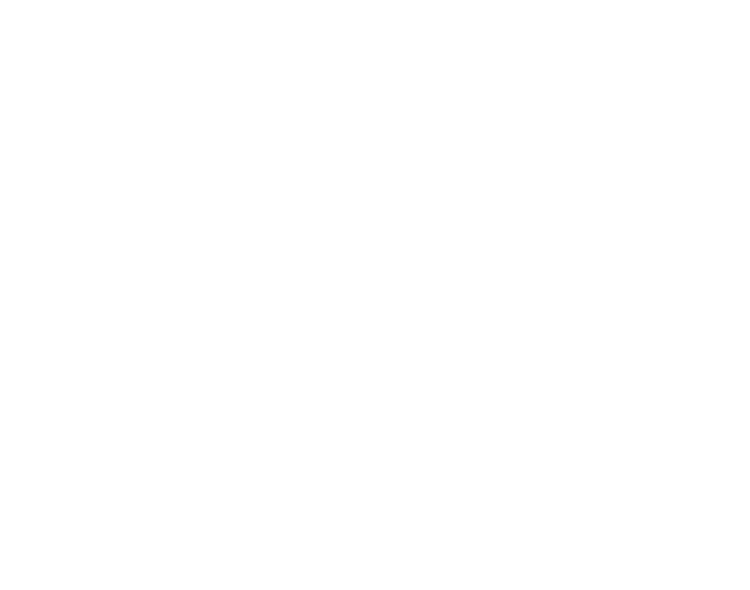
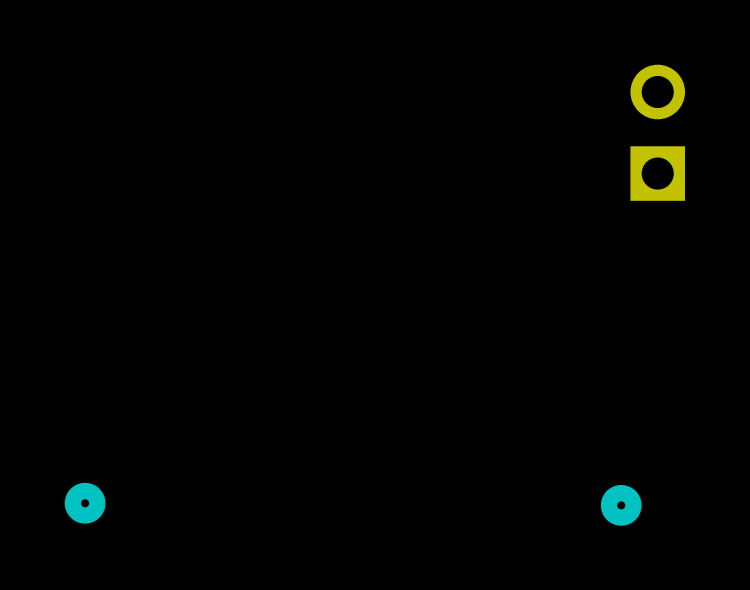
part: none -> (657, 132)
part: none -> (85, 503)
part: none -> (621, 505)

